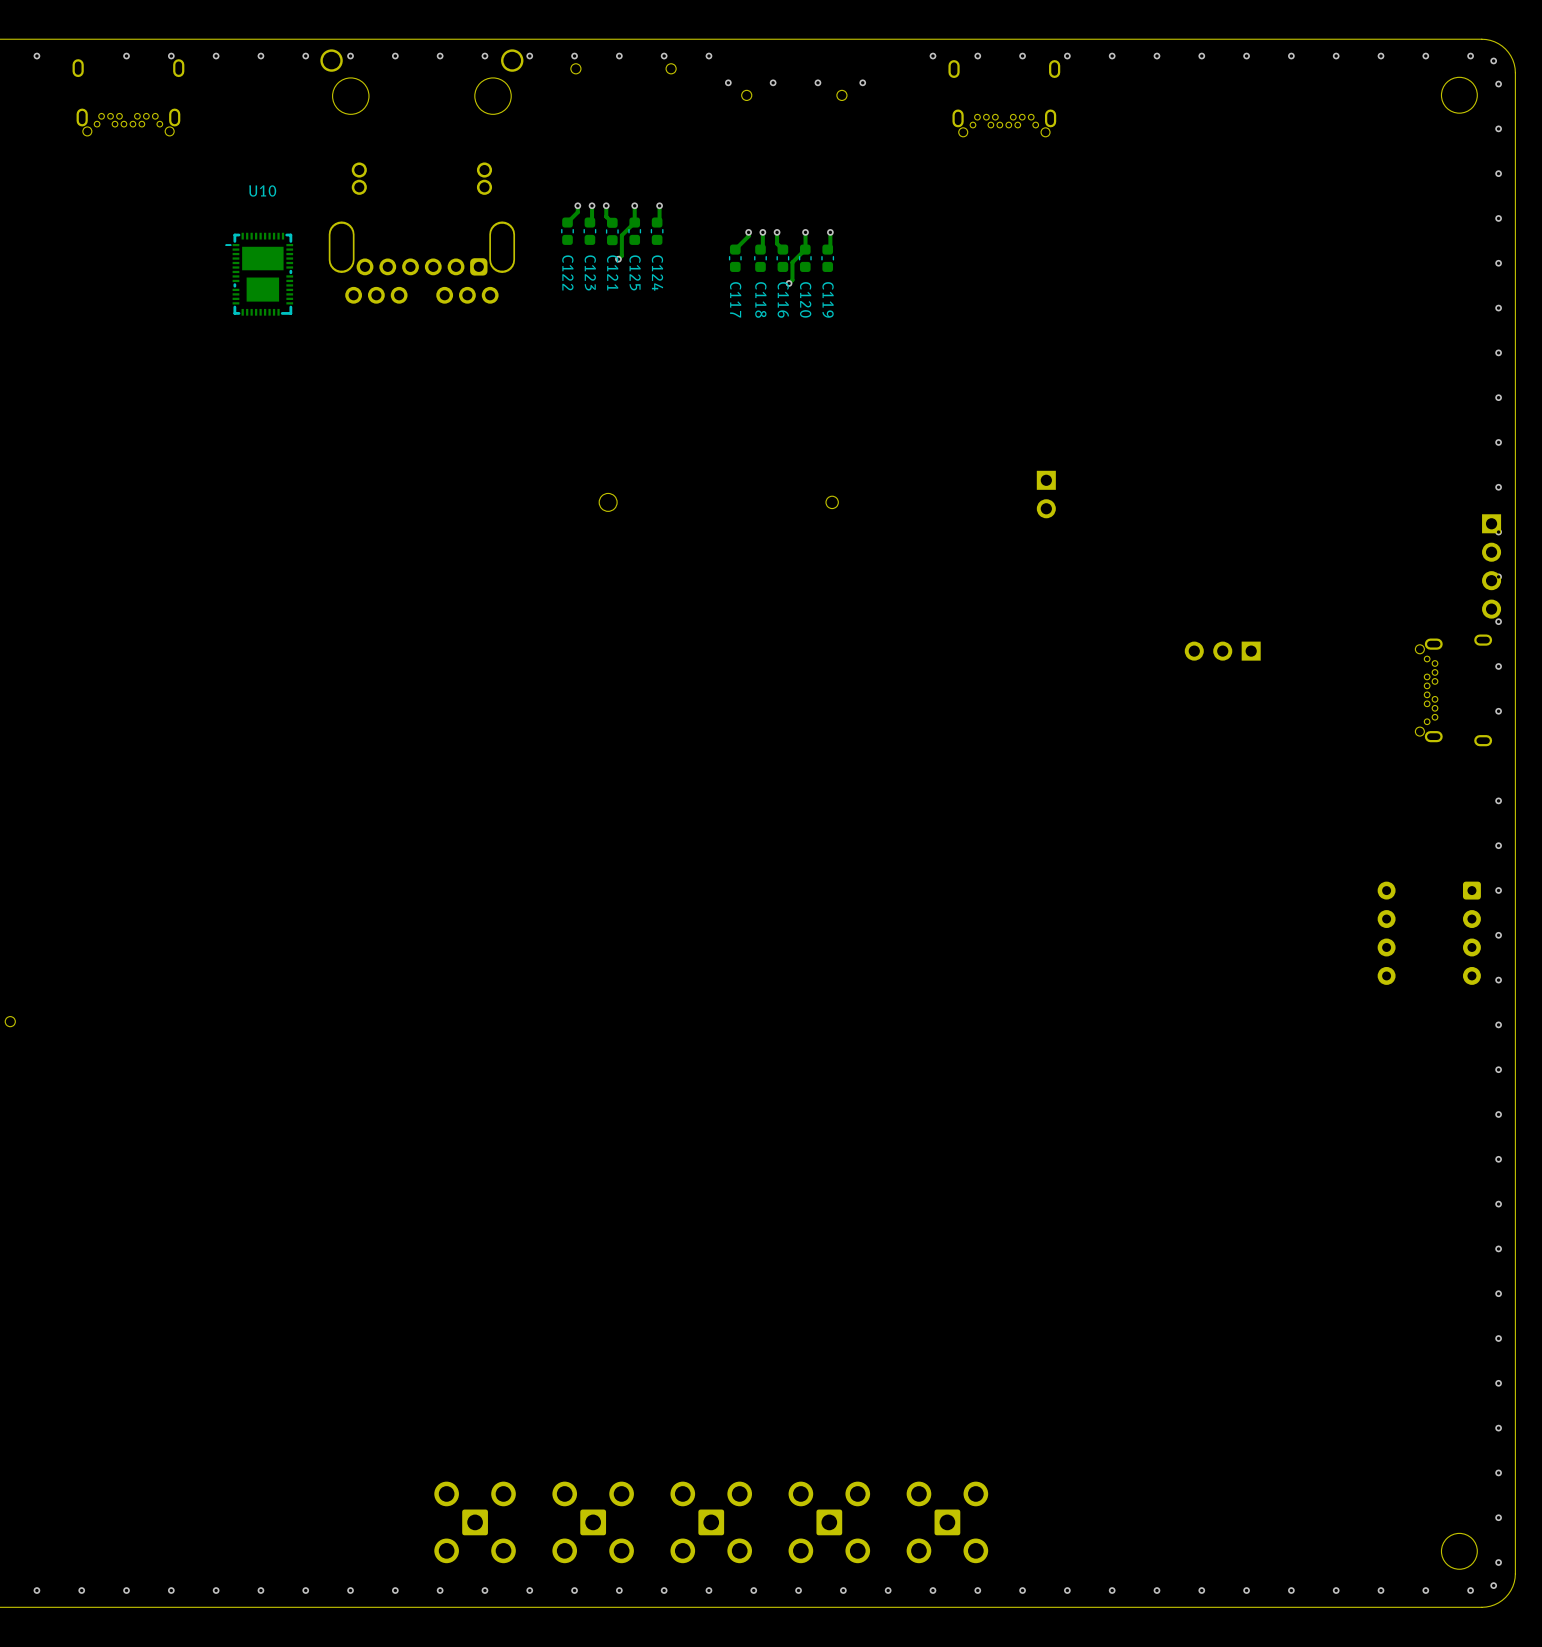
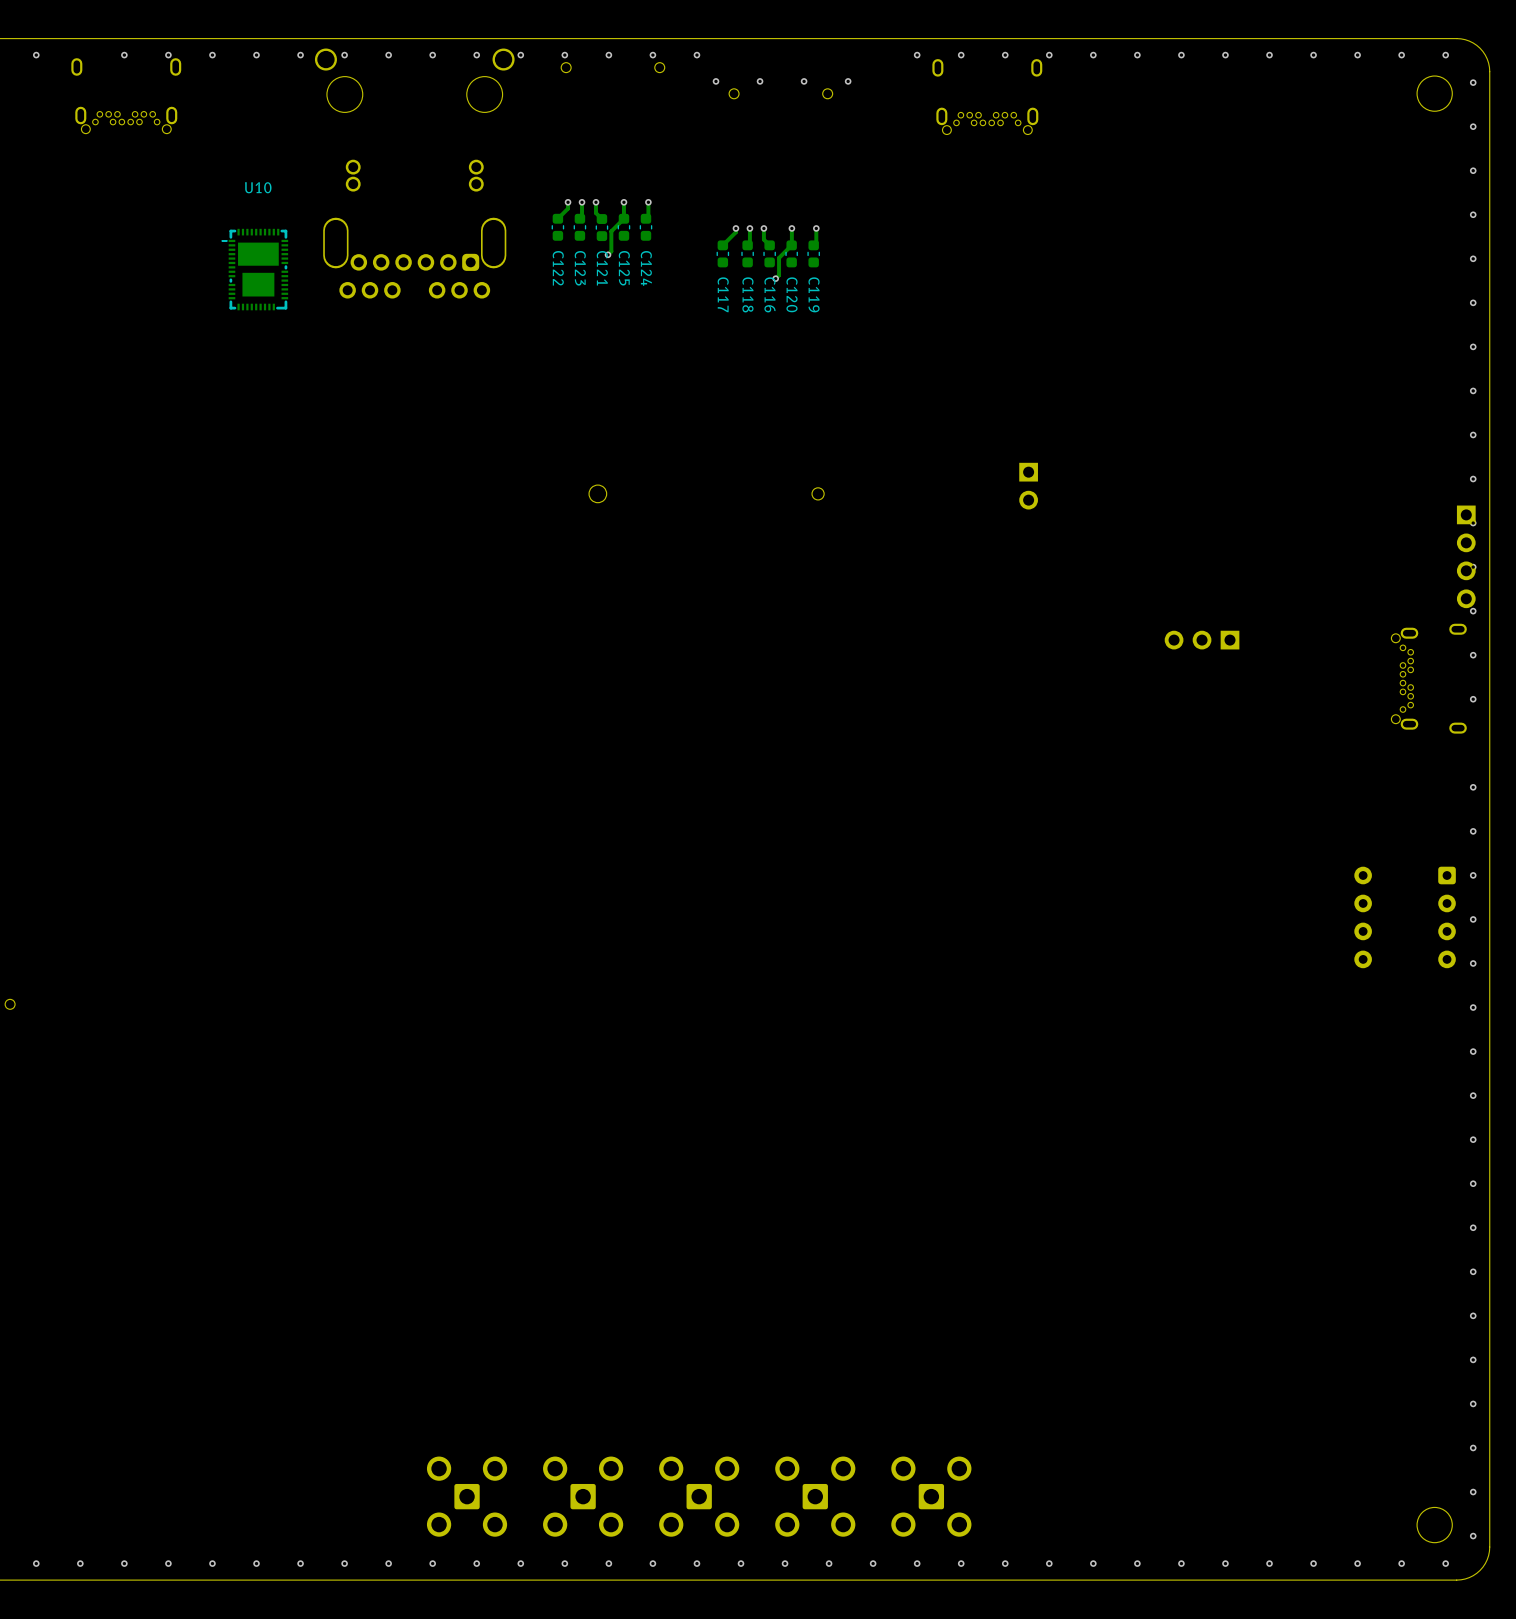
via: (1493, 60) -> none
via: (1493, 1585) -> none

